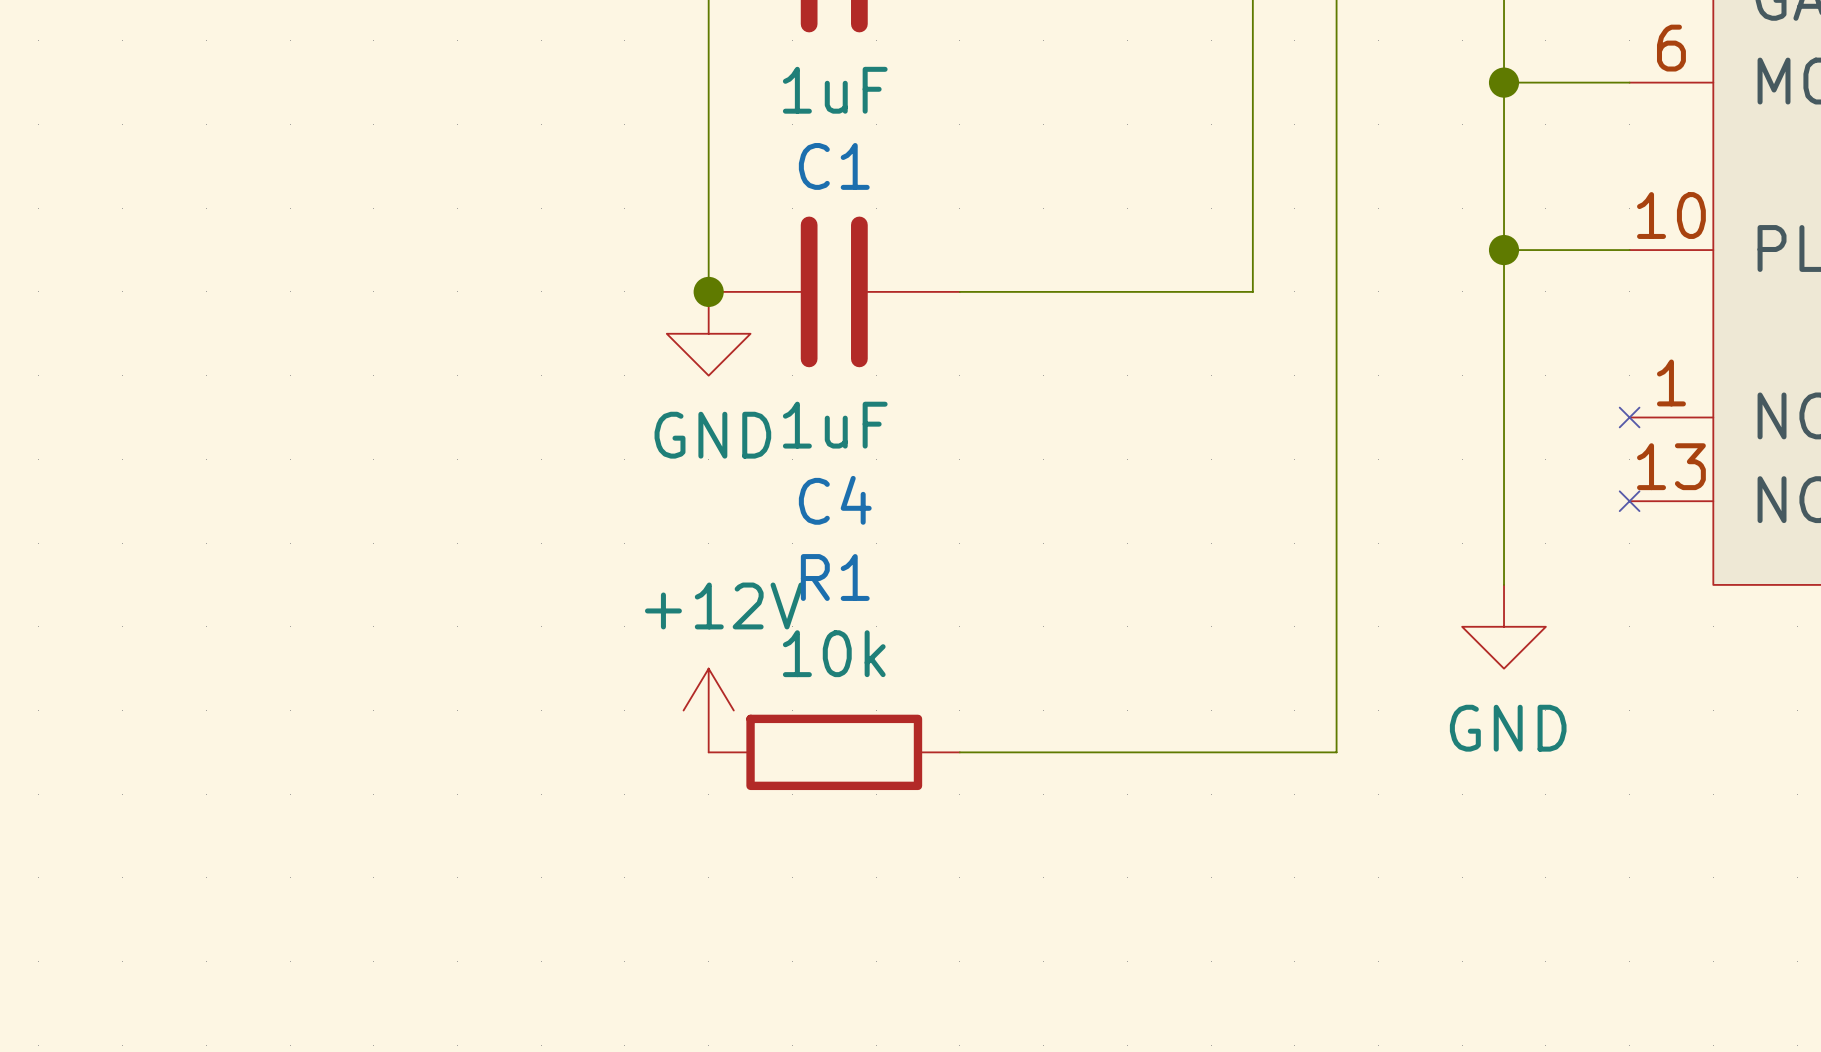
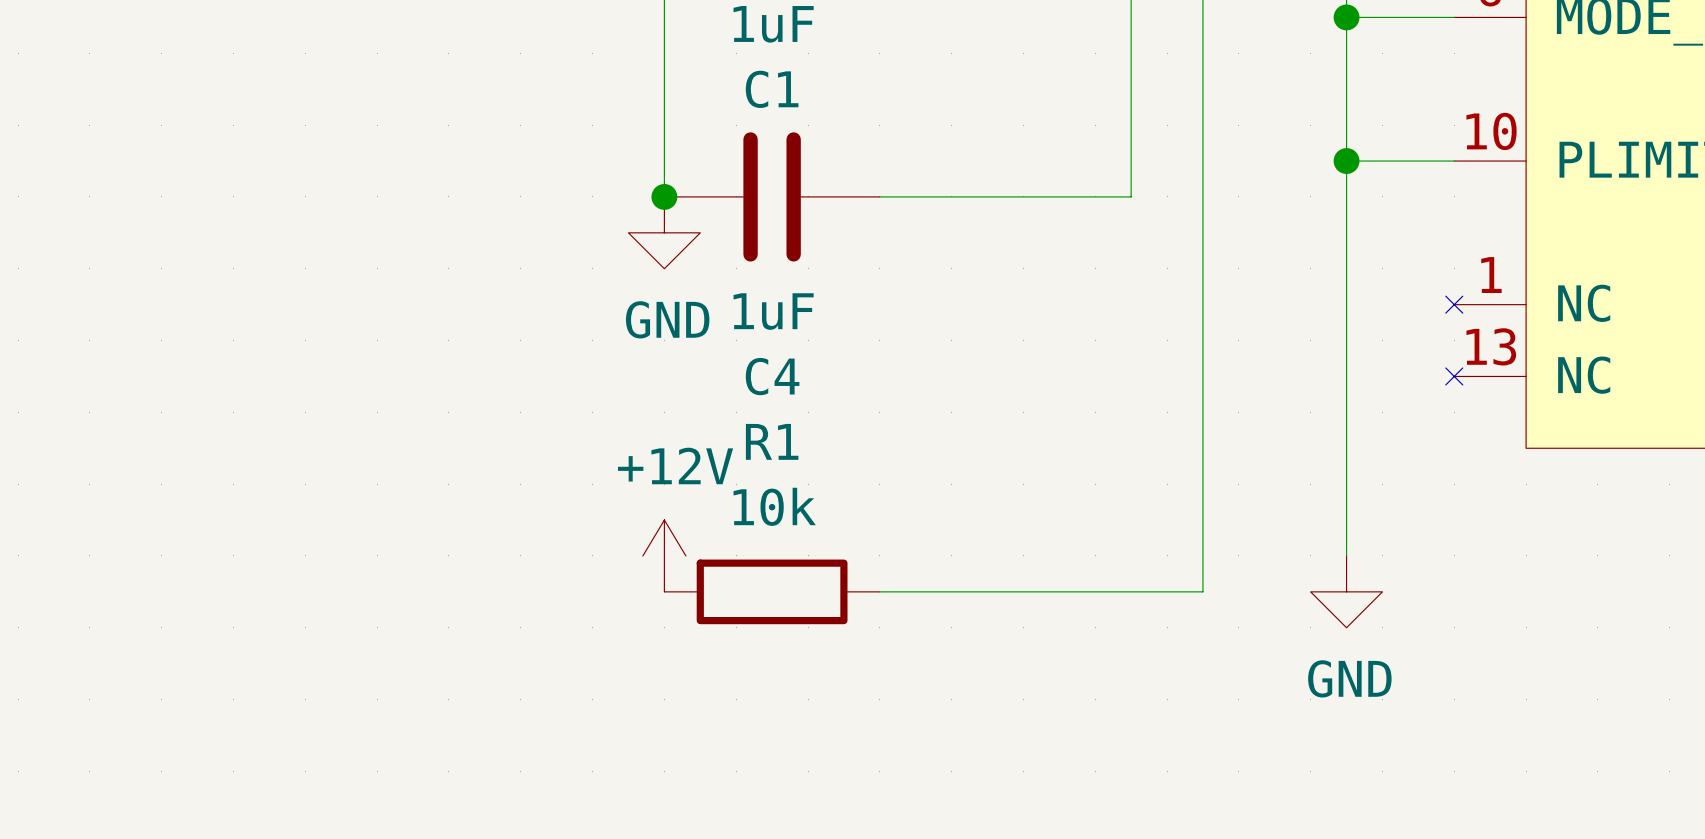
wire: none -> (1346, 448) (1346, 555)
power symbol position: GND (1504, 626) -> GND (1346, 591)

